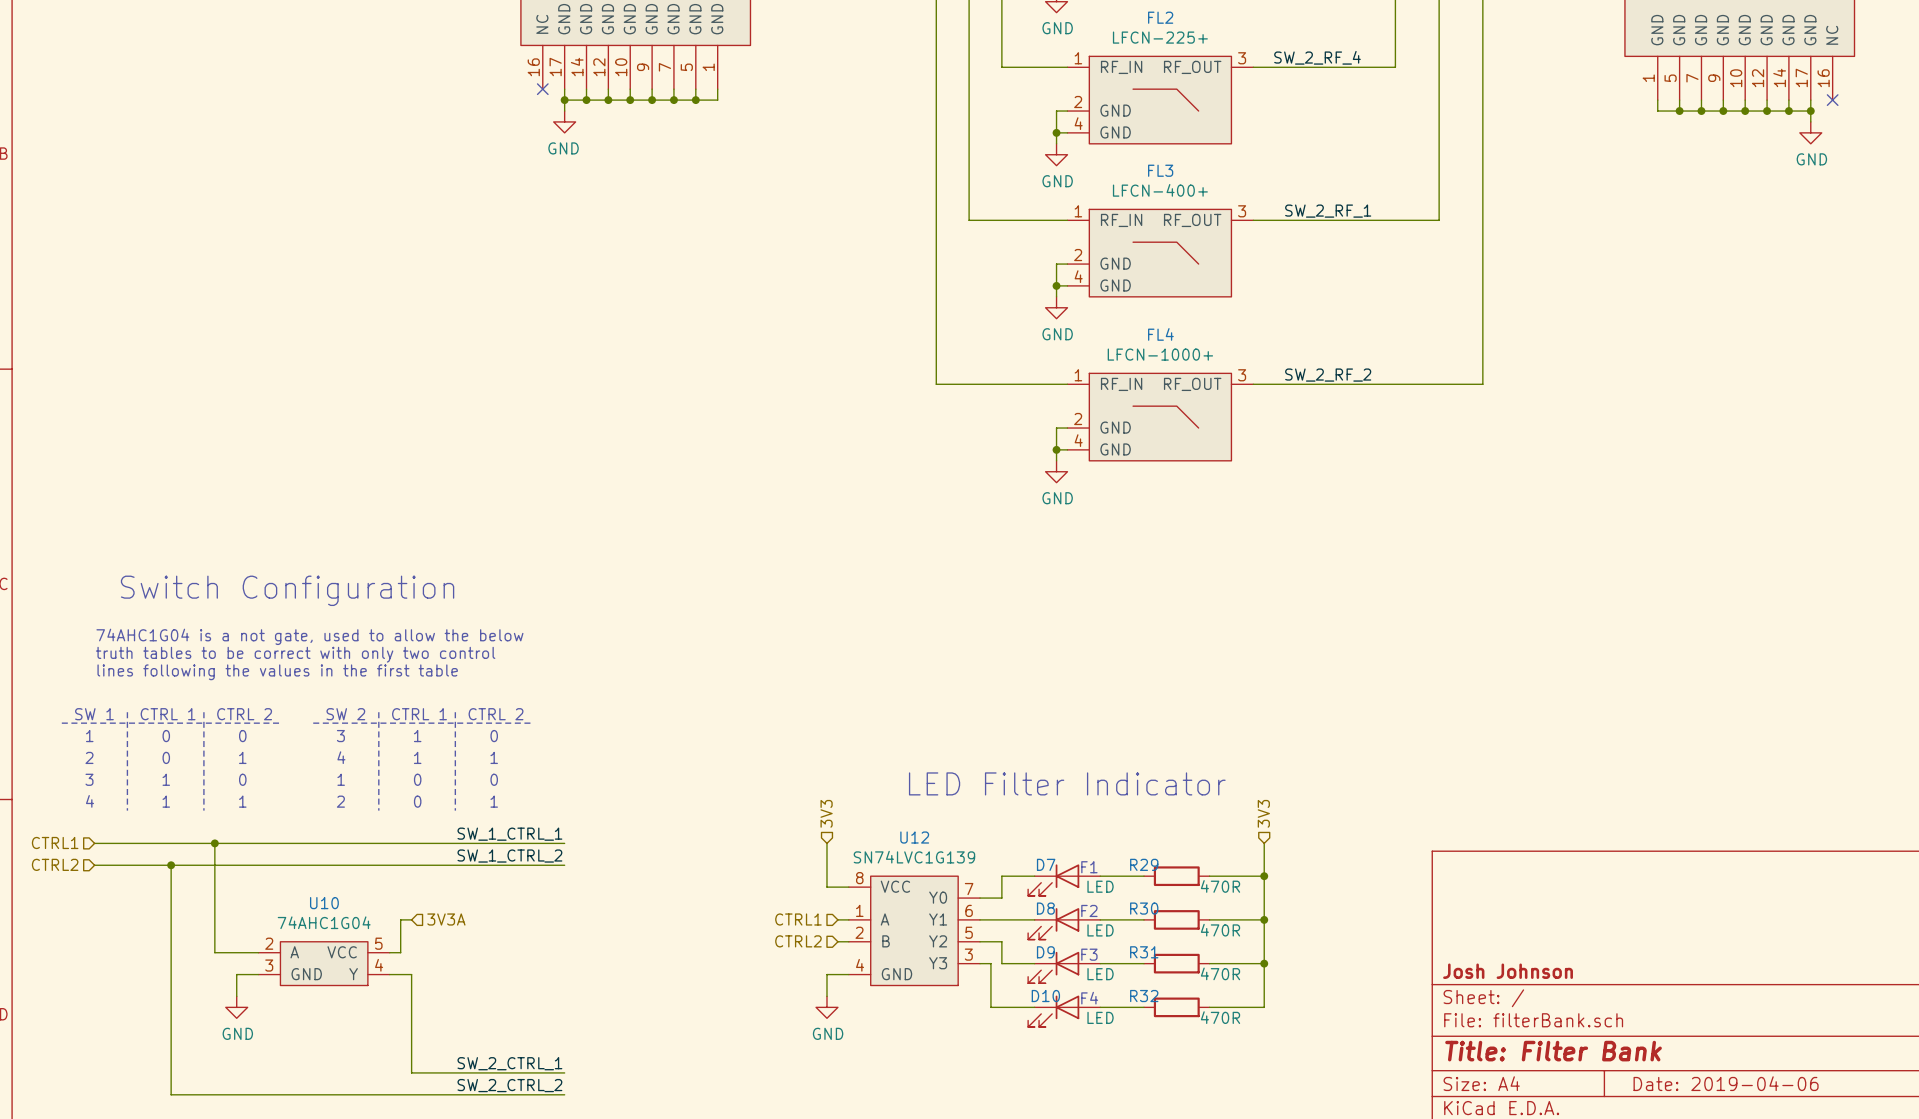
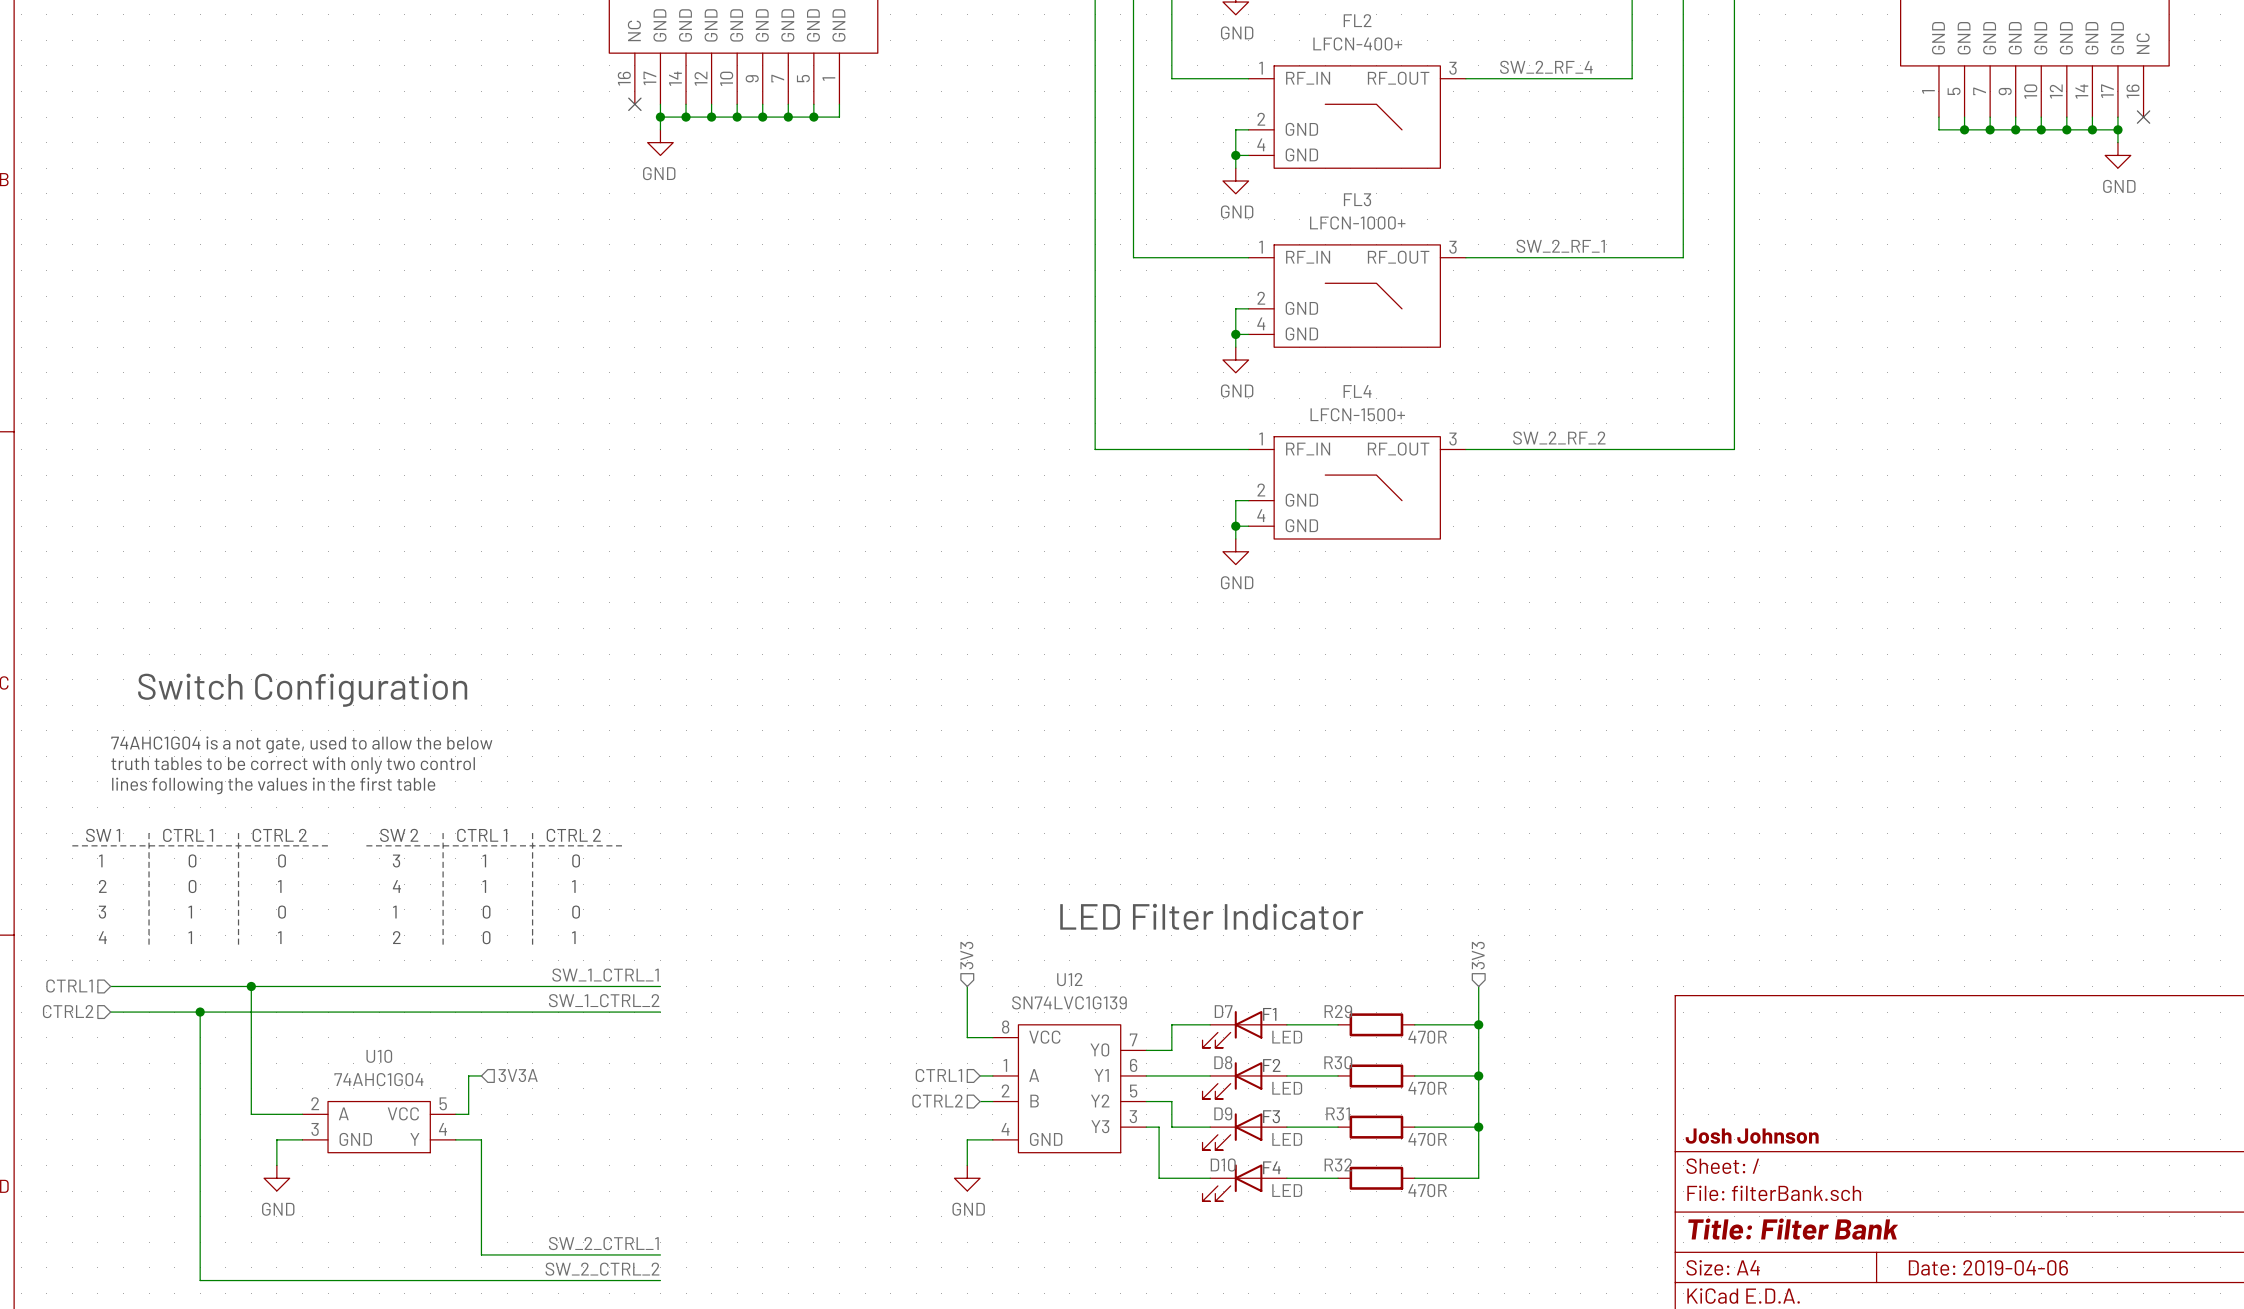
FL2 value: LFCN-225+ (1160, 37) -> LFCN-400+ (1357, 43)
FL3 value: LFCN-400+ (1160, 190) -> LFCN-1000+ (1357, 222)
FL4 value: LFCN-1000+ (1160, 354) -> LFCN-1500+ (1357, 414)

